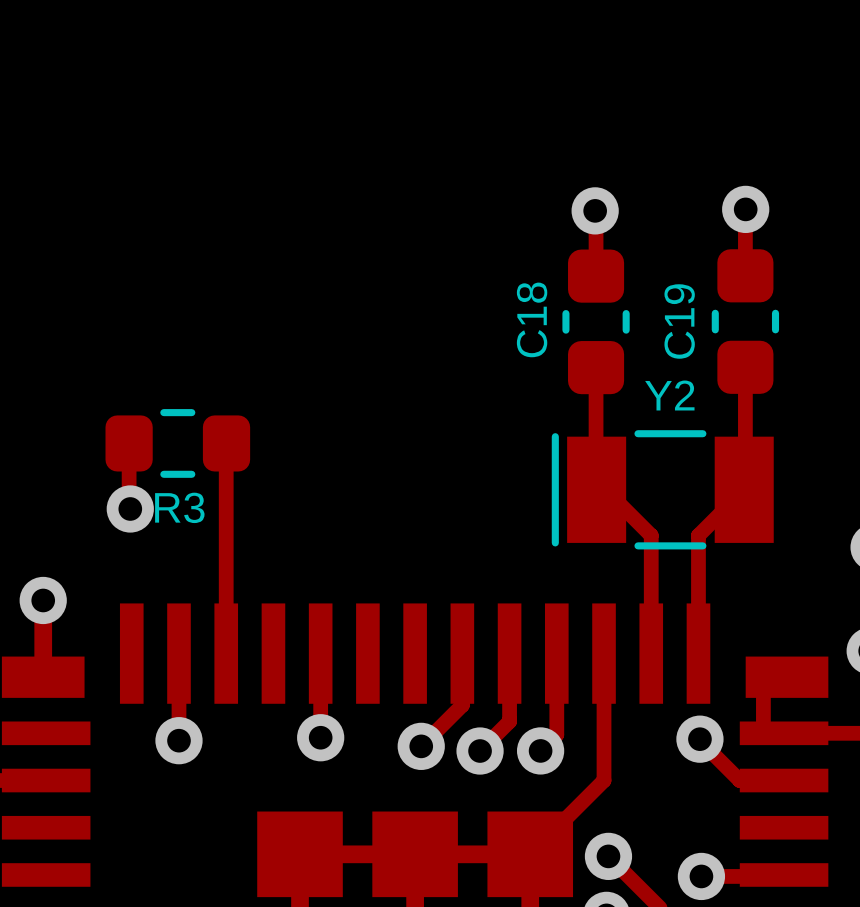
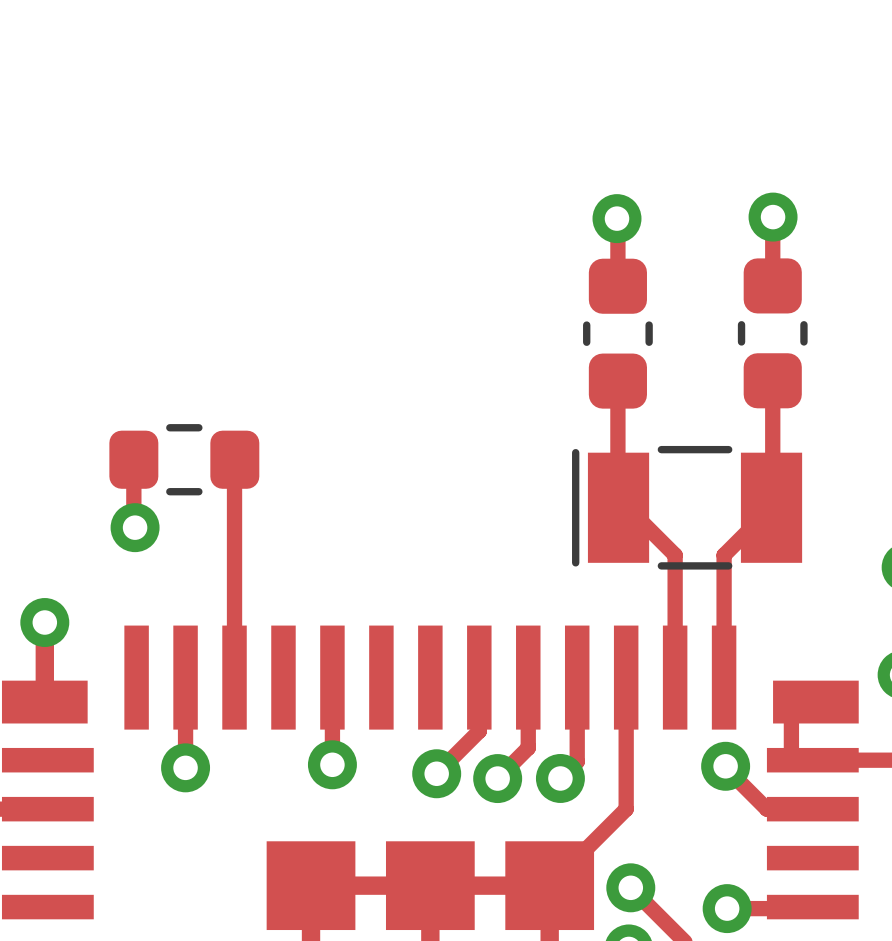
C18 name: C18 (532, 319) -> none
C19 name: C19 (679, 321) -> none
Y2 name: Y2 (669, 395) -> none
R3 name: R3 (179, 507) -> none

